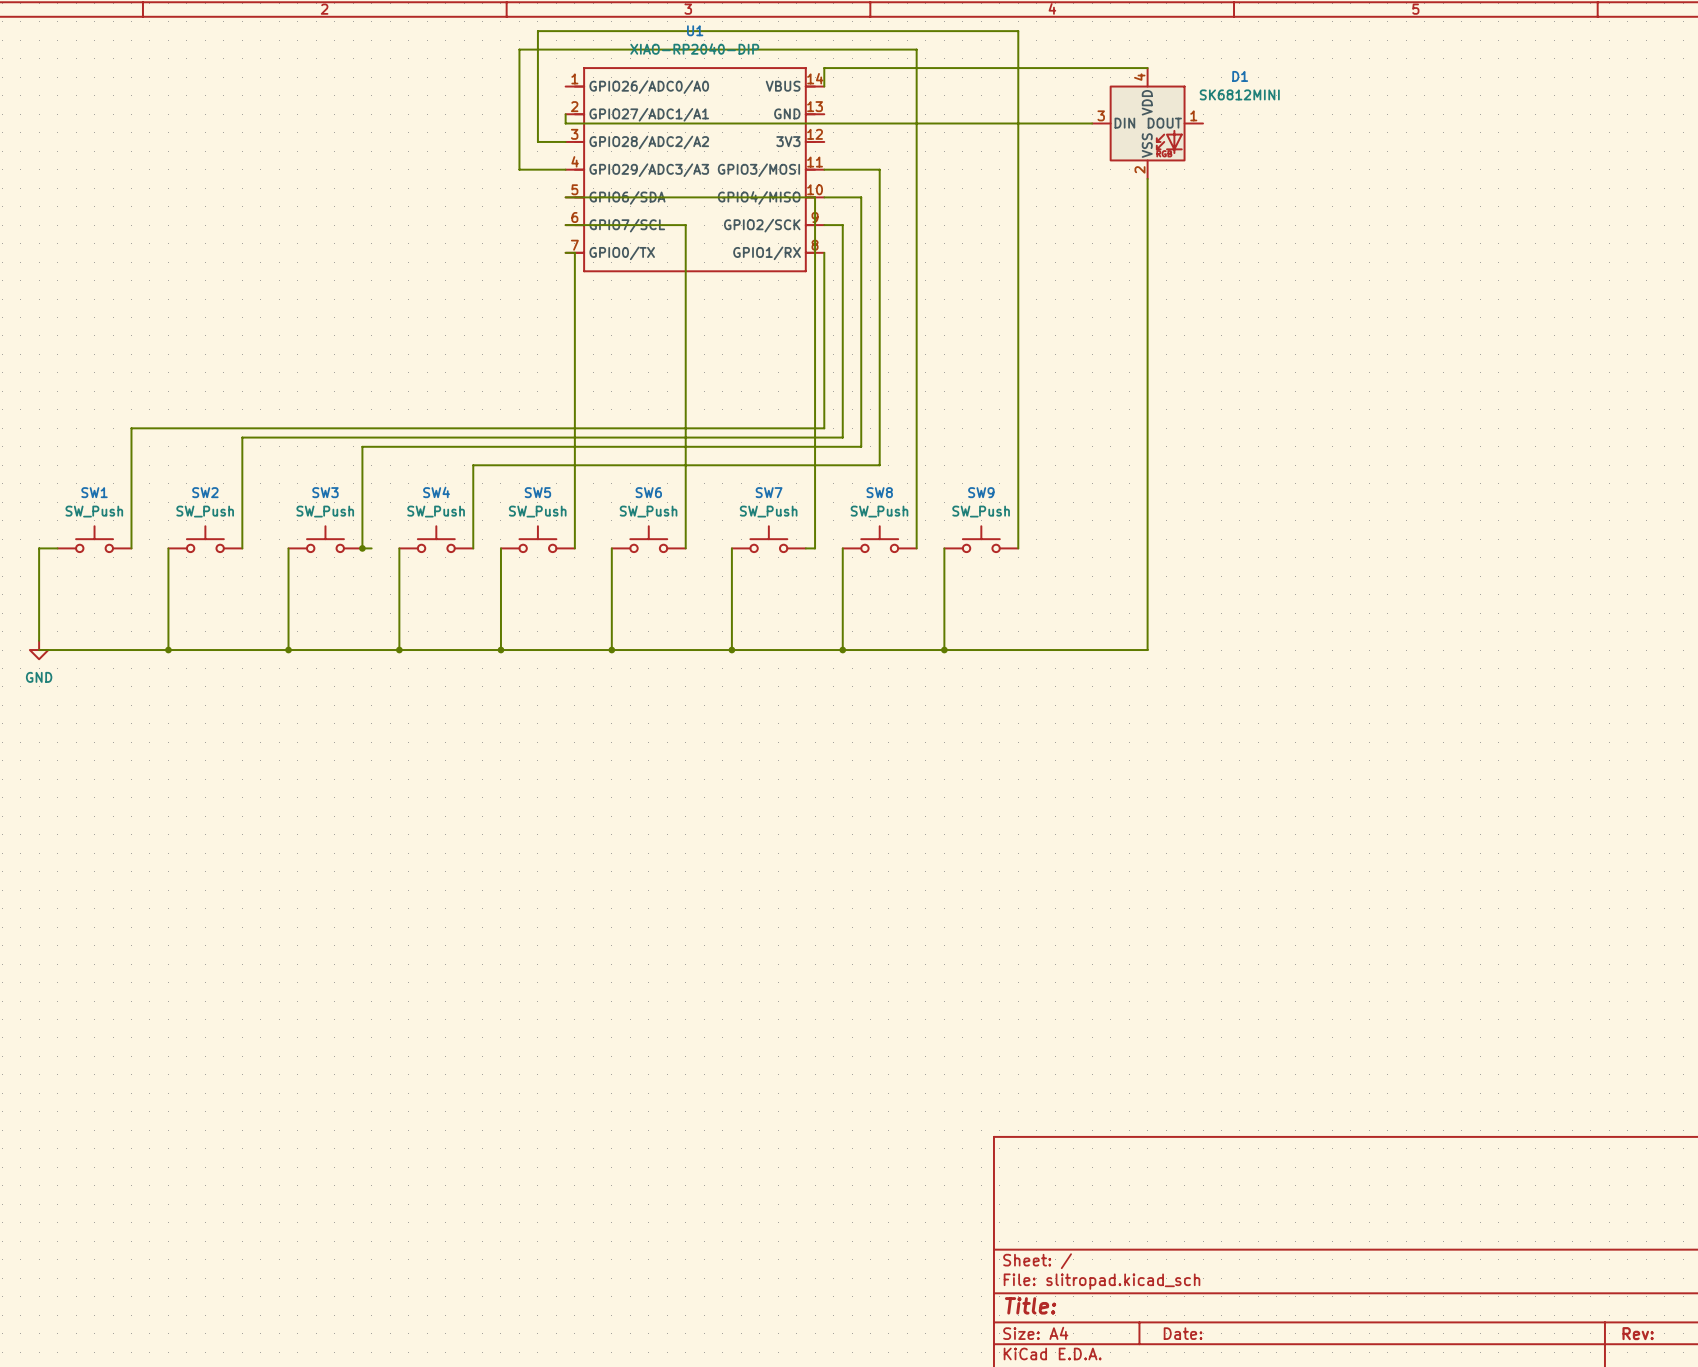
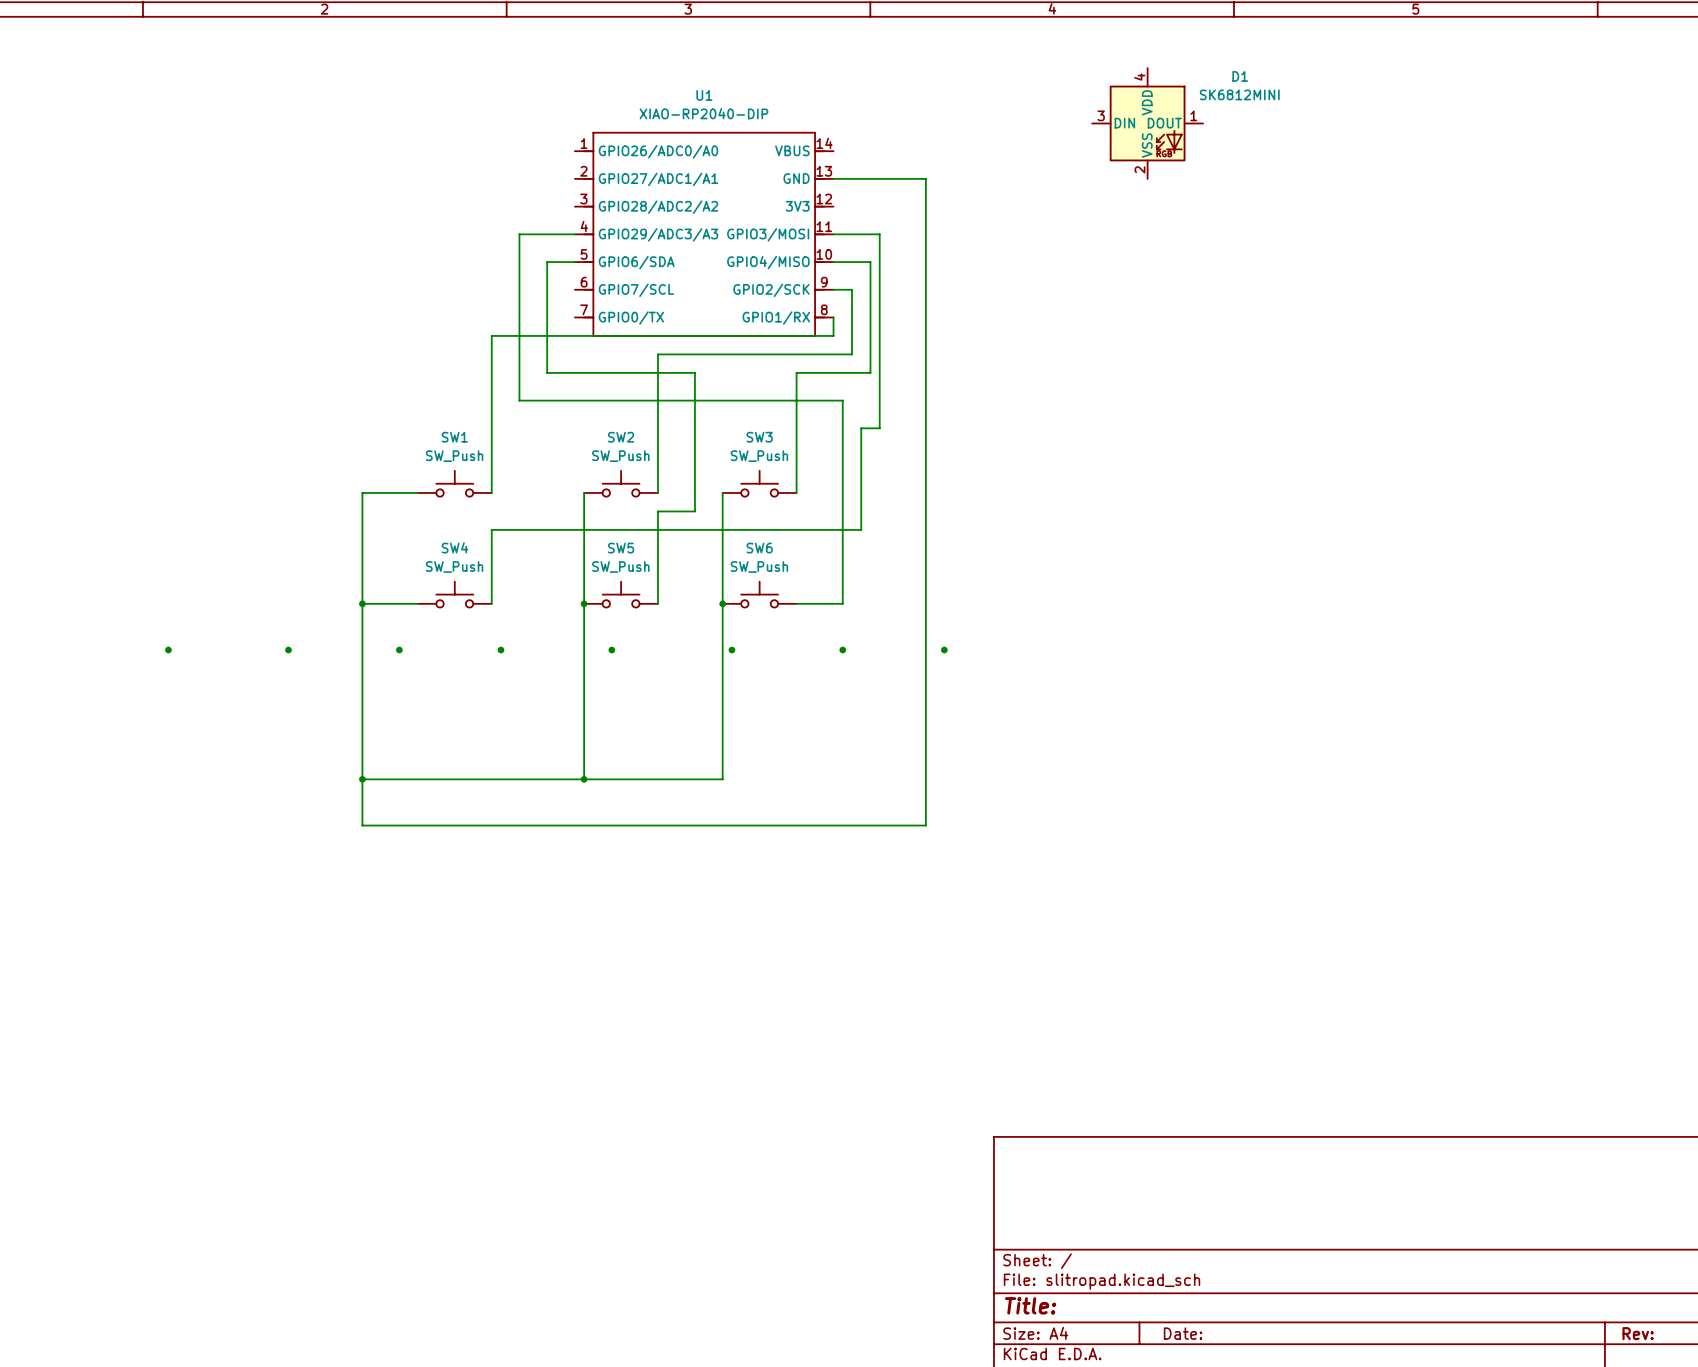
wire: (1147, 68) (824, 68) (824, 86) -> none
wire: (565, 114) (565, 123) (1092, 123) -> none
wire: (565, 141) (537, 141) (537, 31) (1018, 31) (1018, 548) -> none
wire: (565, 169) (519, 169) (519, 49) (916, 49) (916, 548) -> none
U1 position: (694, 169) -> (704, 234)
wire: (824, 169) (879, 169) (879, 234) -> (833, 234) (879, 234)
wire: (1147, 178) (1147, 650) (39, 650) -> none
wire: (565, 197) (815, 197) (815, 548) (805, 548) -> none
wire: (824, 197) (861, 197) (861, 428) -> (879, 428) (861, 428)
wire: (565, 225) (685, 225) (685, 548) -> none
wire: (824, 225) (842, 225) (842, 400) -> (574, 234) (519, 234) (519, 400) (842, 400)
wire: (565, 252) (574, 252) (574, 548) -> none
wire: (824, 252) (824, 428) (131, 428) (131, 548) -> none
wire: none -> (574, 262) (547, 262) (547, 372) (694, 372) (694, 511) (658, 511) (658, 603)
wire: none -> (833, 262) (870, 262) (870, 372) (796, 372) (796, 492)
wire: none -> (833, 289) (852, 289) (852, 354) (658, 354) (658, 492)
wire: none -> (833, 317) (833, 335) (491, 335) (491, 492)
wire: (879, 428) (879, 465) (473, 465) (473, 548) -> none
wire: (842, 437) (242, 437) (242, 548) -> (842, 437) (842, 548)
wire: (861, 446) (362, 446) (362, 492) -> (861, 446) (861, 529) (491, 529) (491, 603)
wire: none -> (362, 492) (417, 492)
wire: none -> (584, 492) (584, 779)
wire: none -> (722, 492) (722, 779) (362, 779)
SW1 position: (94, 539) -> (454, 483)
SW2 position: (205, 539) -> (621, 483)
SW3 position: (325, 539) -> (759, 483)
SW4 position: (436, 539) -> (454, 594)
SW5 position: (537, 539) -> (621, 594)
SW6 position: (648, 539) -> (759, 594)
SW7: SW_Push (768, 539) -> none
SW8: SW_Push (879, 539) -> none
SW9: SW_Push (981, 539) -> none
wire: (57, 548) (39, 548) (39, 640) -> none
wire: (168, 548) (168, 650) -> none
wire: (288, 548) (288, 650) -> none
wire: (362, 548) (371, 548) -> (362, 548) (362, 825) (925, 825) (925, 178) (833, 178)
junction: (362, 548) -> none
wire: (399, 548) (399, 650) -> none
wire: (500, 548) (500, 650) -> none
wire: (611, 548) (611, 650) -> none
wire: (731, 548) (731, 650) -> none
wire: (944, 548) (944, 650) -> none
wire: none -> (362, 603) (417, 603)
junction: none -> (362, 603)
junction: none -> (584, 603)
junction: none -> (722, 603)
wire: (842, 603) (842, 650) -> (842, 603) (796, 603)
power symbol: GND (39, 650) -> none
junction: none -> (362, 779)
junction: none -> (584, 779)

